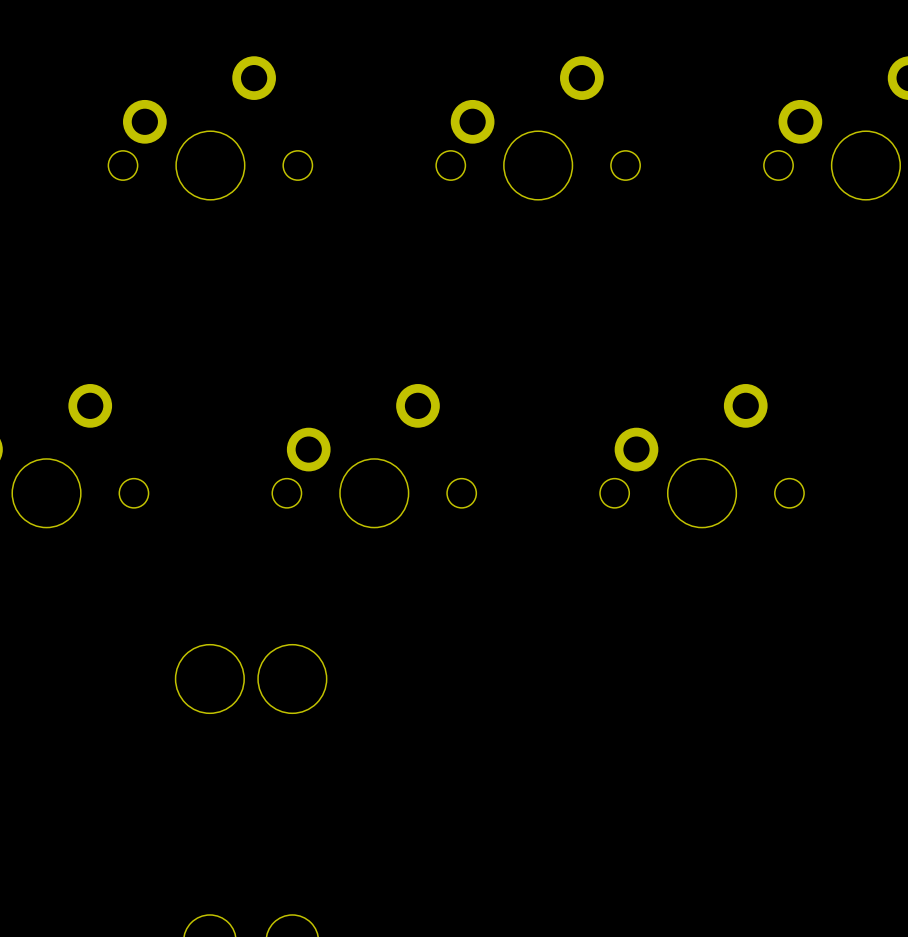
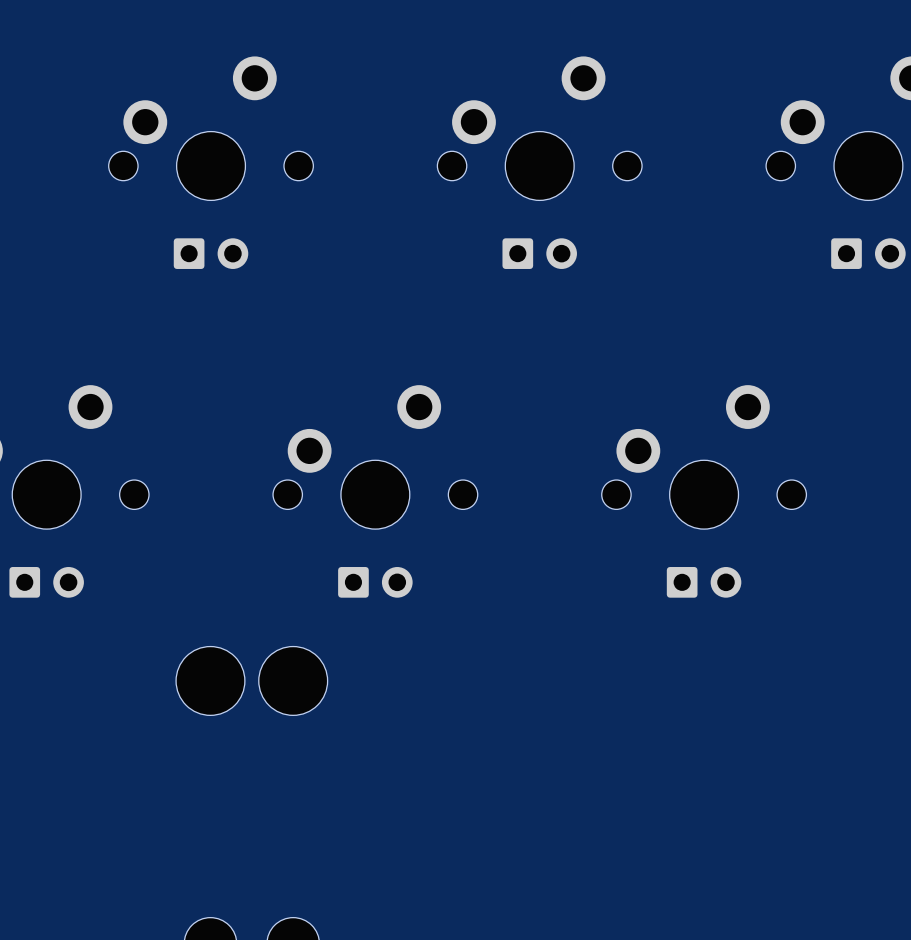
part: none -> (211, 253)
part: none -> (539, 253)
part: none -> (868, 253)
part: none -> (46, 582)
part: none -> (375, 582)
part: none -> (704, 582)

